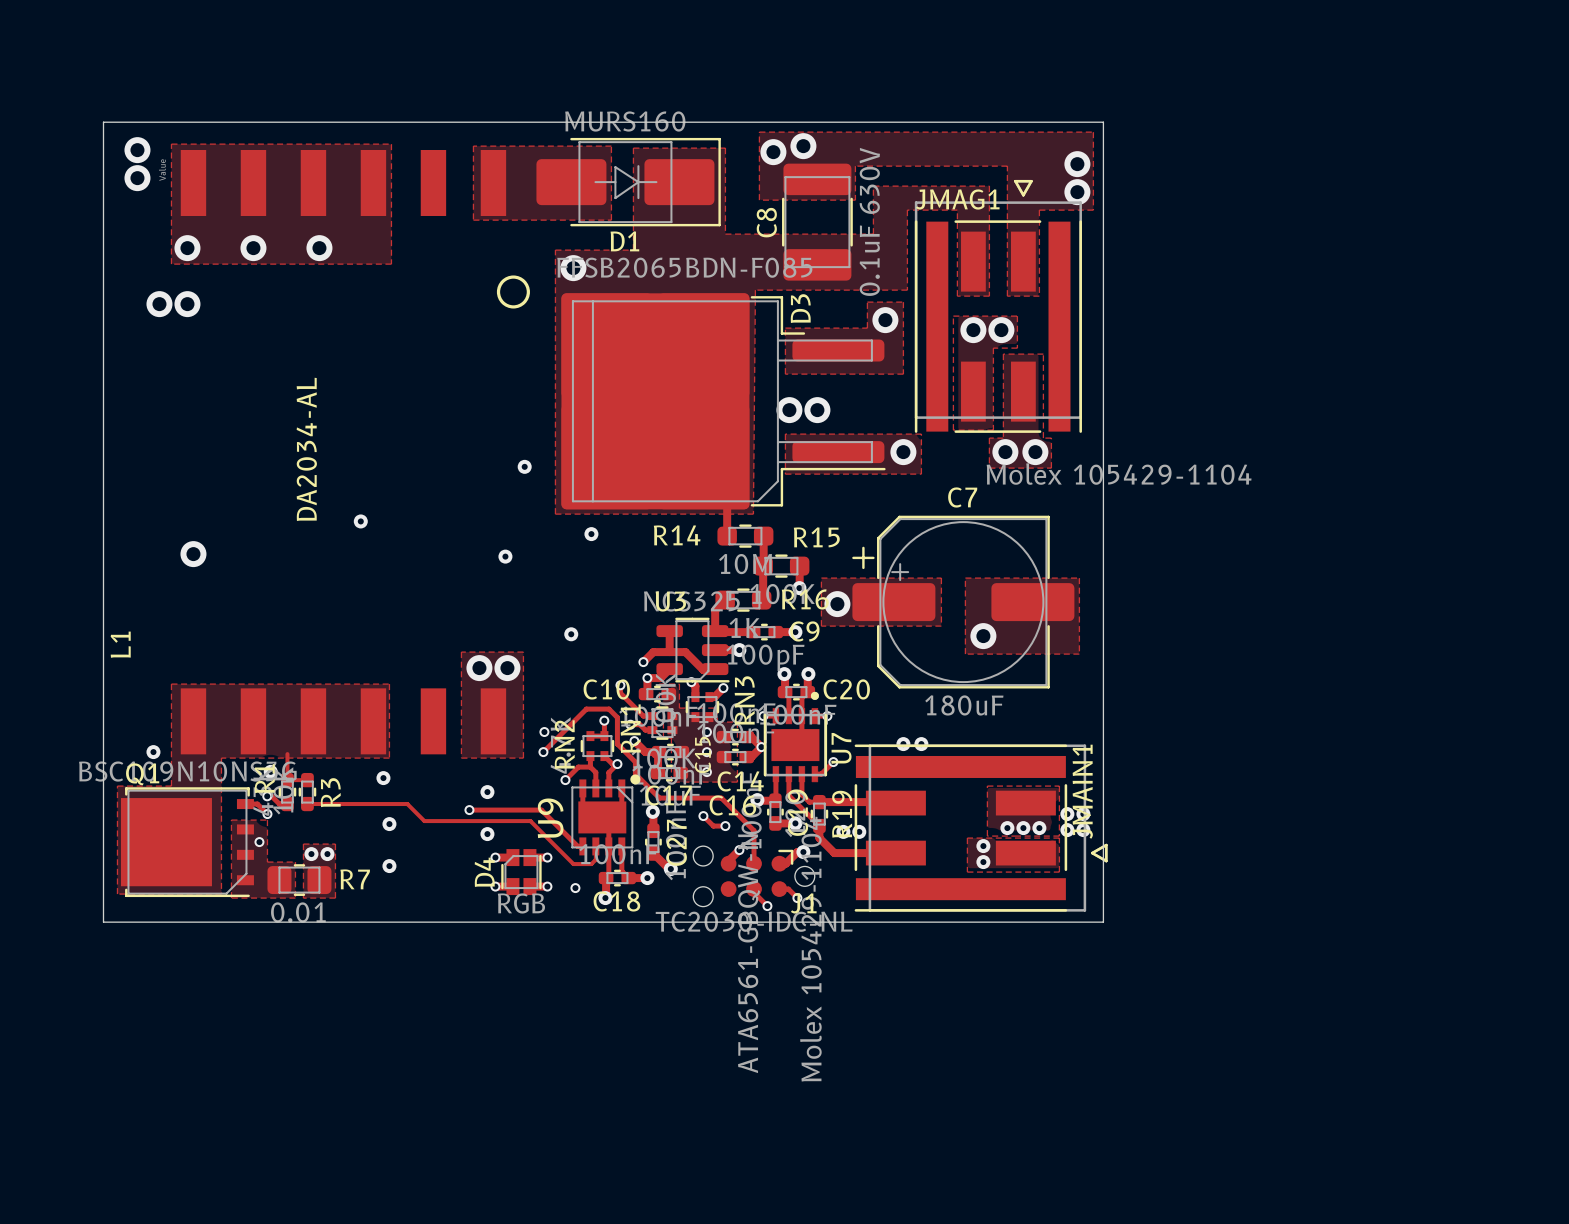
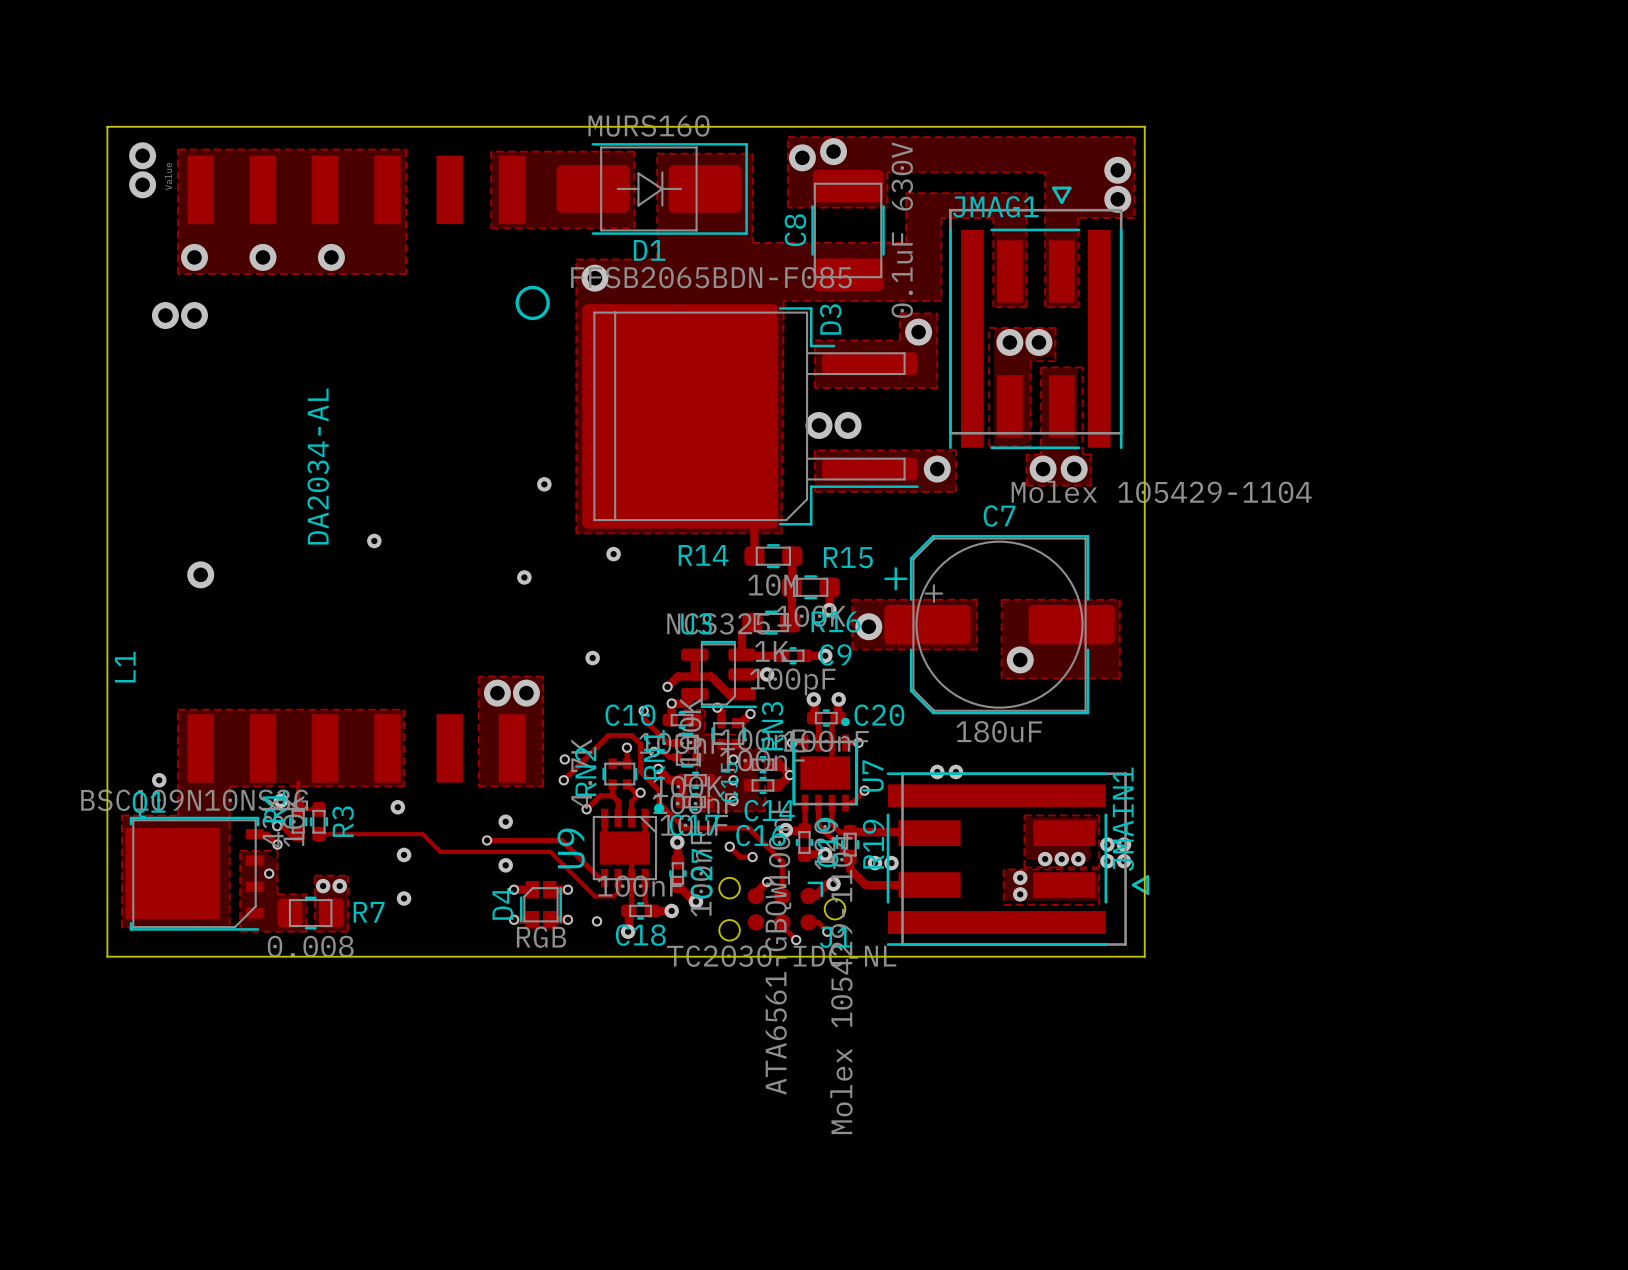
R7 value: 0.01 (298, 912) -> 0.008 (310, 946)
U7 value: ATA6561-GBQW-N (748, 953) -> ATA6561-GBQW (778, 988)

